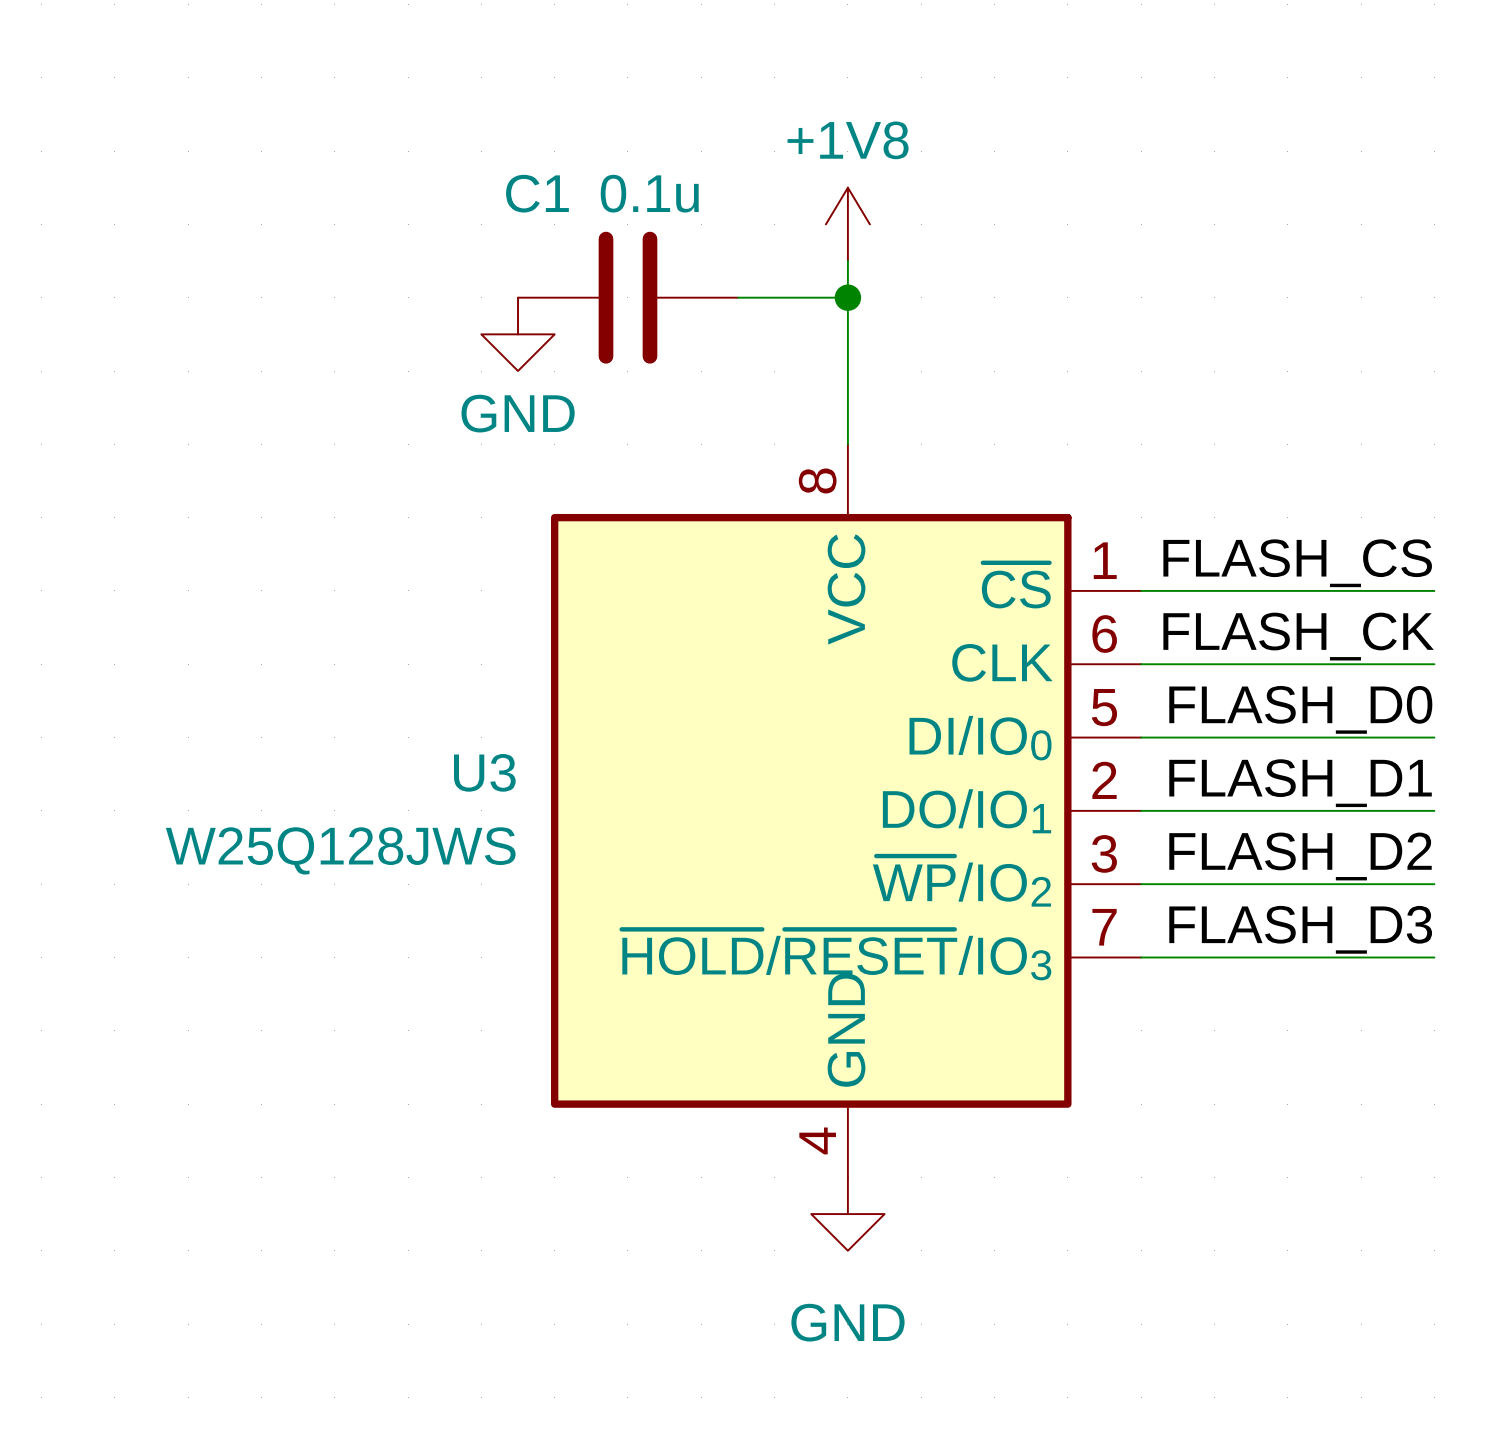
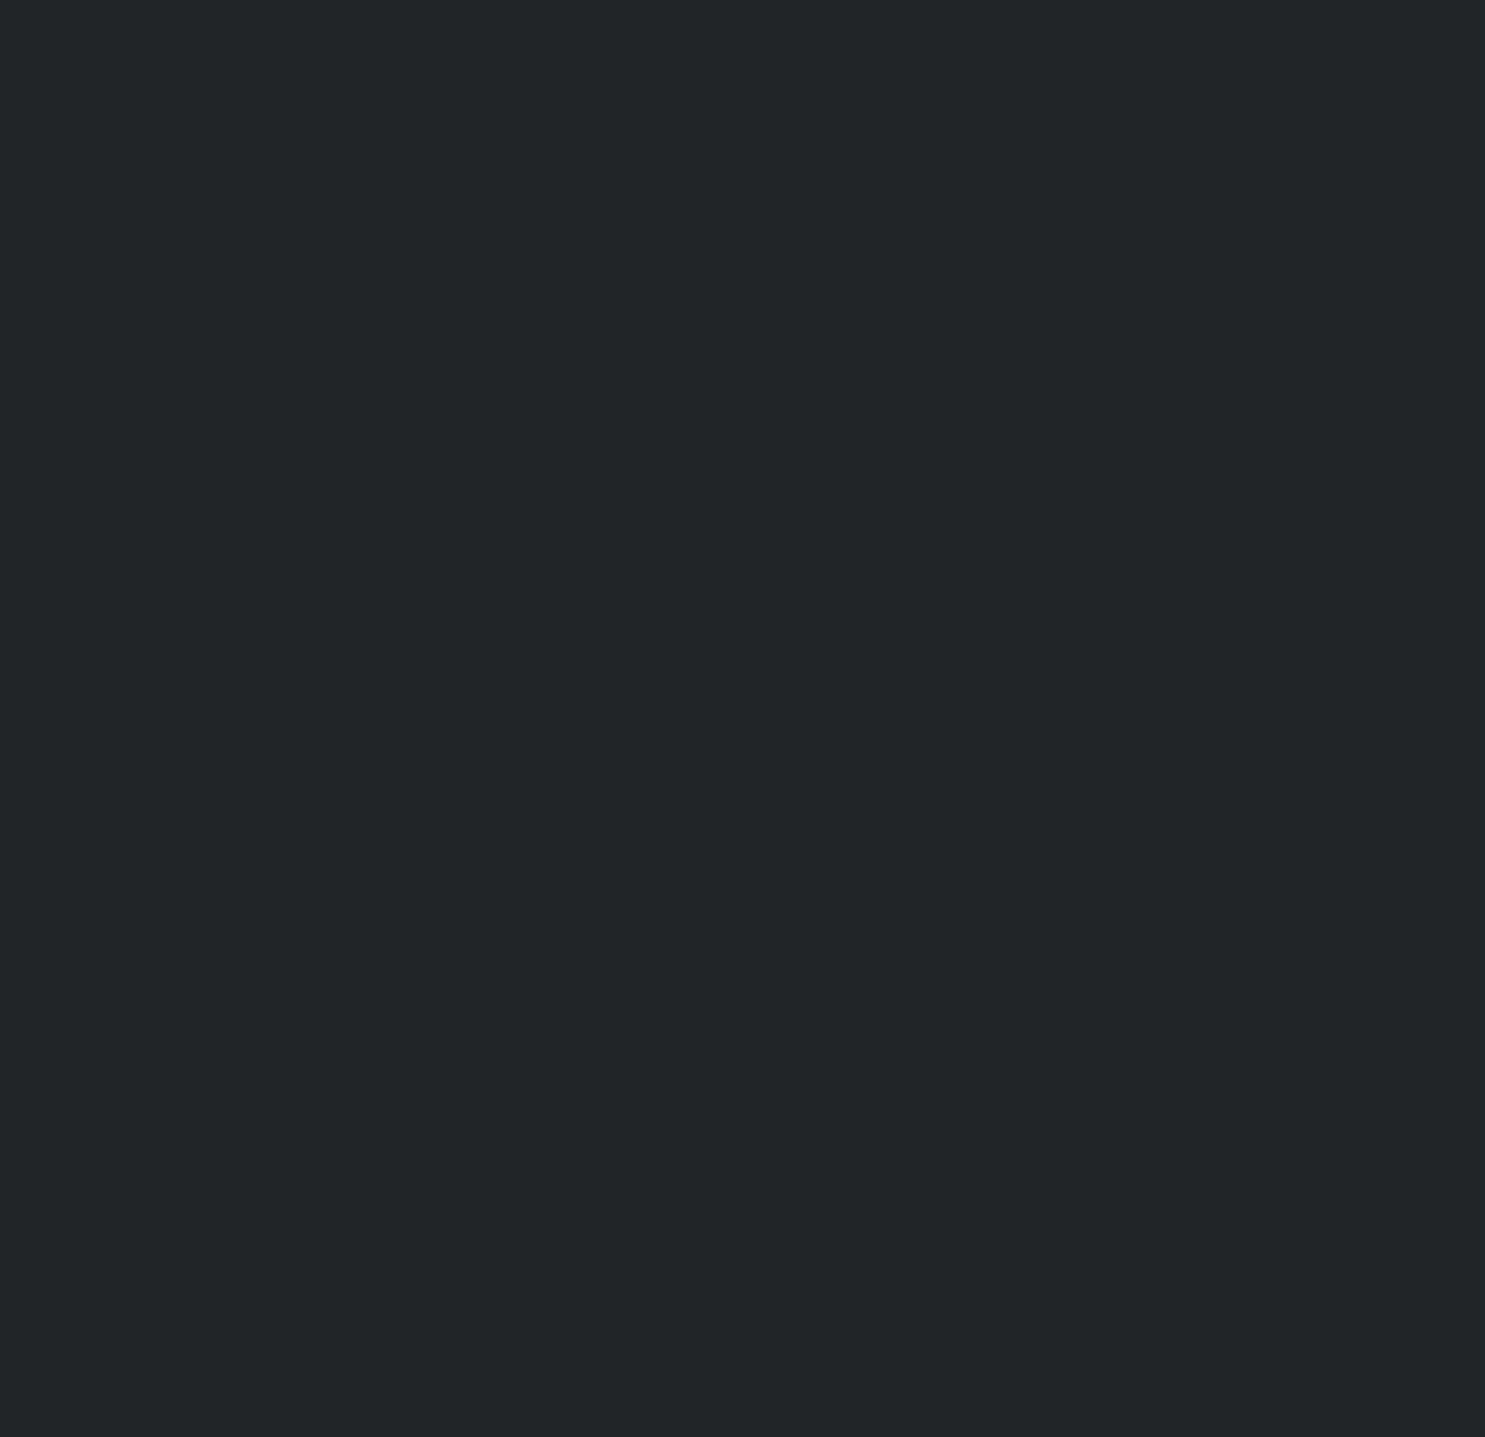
power symbol: +1V8 (847, 224) -> none
wire: (847, 261) (847, 444) -> none
C1: 0.1u (627, 297) -> none
wire: (737, 297) (847, 297) -> none
junction: (847, 297) -> none
power symbol: GND (518, 334) -> none
label: FLASH_CS (1297, 563) -> none
wire: (1141, 590) (1434, 590) -> none
label: FLASH_CK (1298, 636) -> none
wire: (1141, 664) (1434, 664) -> none
label: FLASH_D0 (1300, 709) -> none
wire: (1141, 737) (1434, 737) -> none
label: FLASH_D1 (1300, 783) -> none
U3: W25Q128JWS (846, 810) -> none
wire: (1141, 810) (1434, 810) -> none
label: FLASH_D2 (1300, 856) -> none
wire: (1141, 884) (1434, 884) -> none
label: FLASH_D3 (1300, 929) -> none
wire: (1141, 957) (1434, 957) -> none
power symbol: GND (847, 1214) -> none

